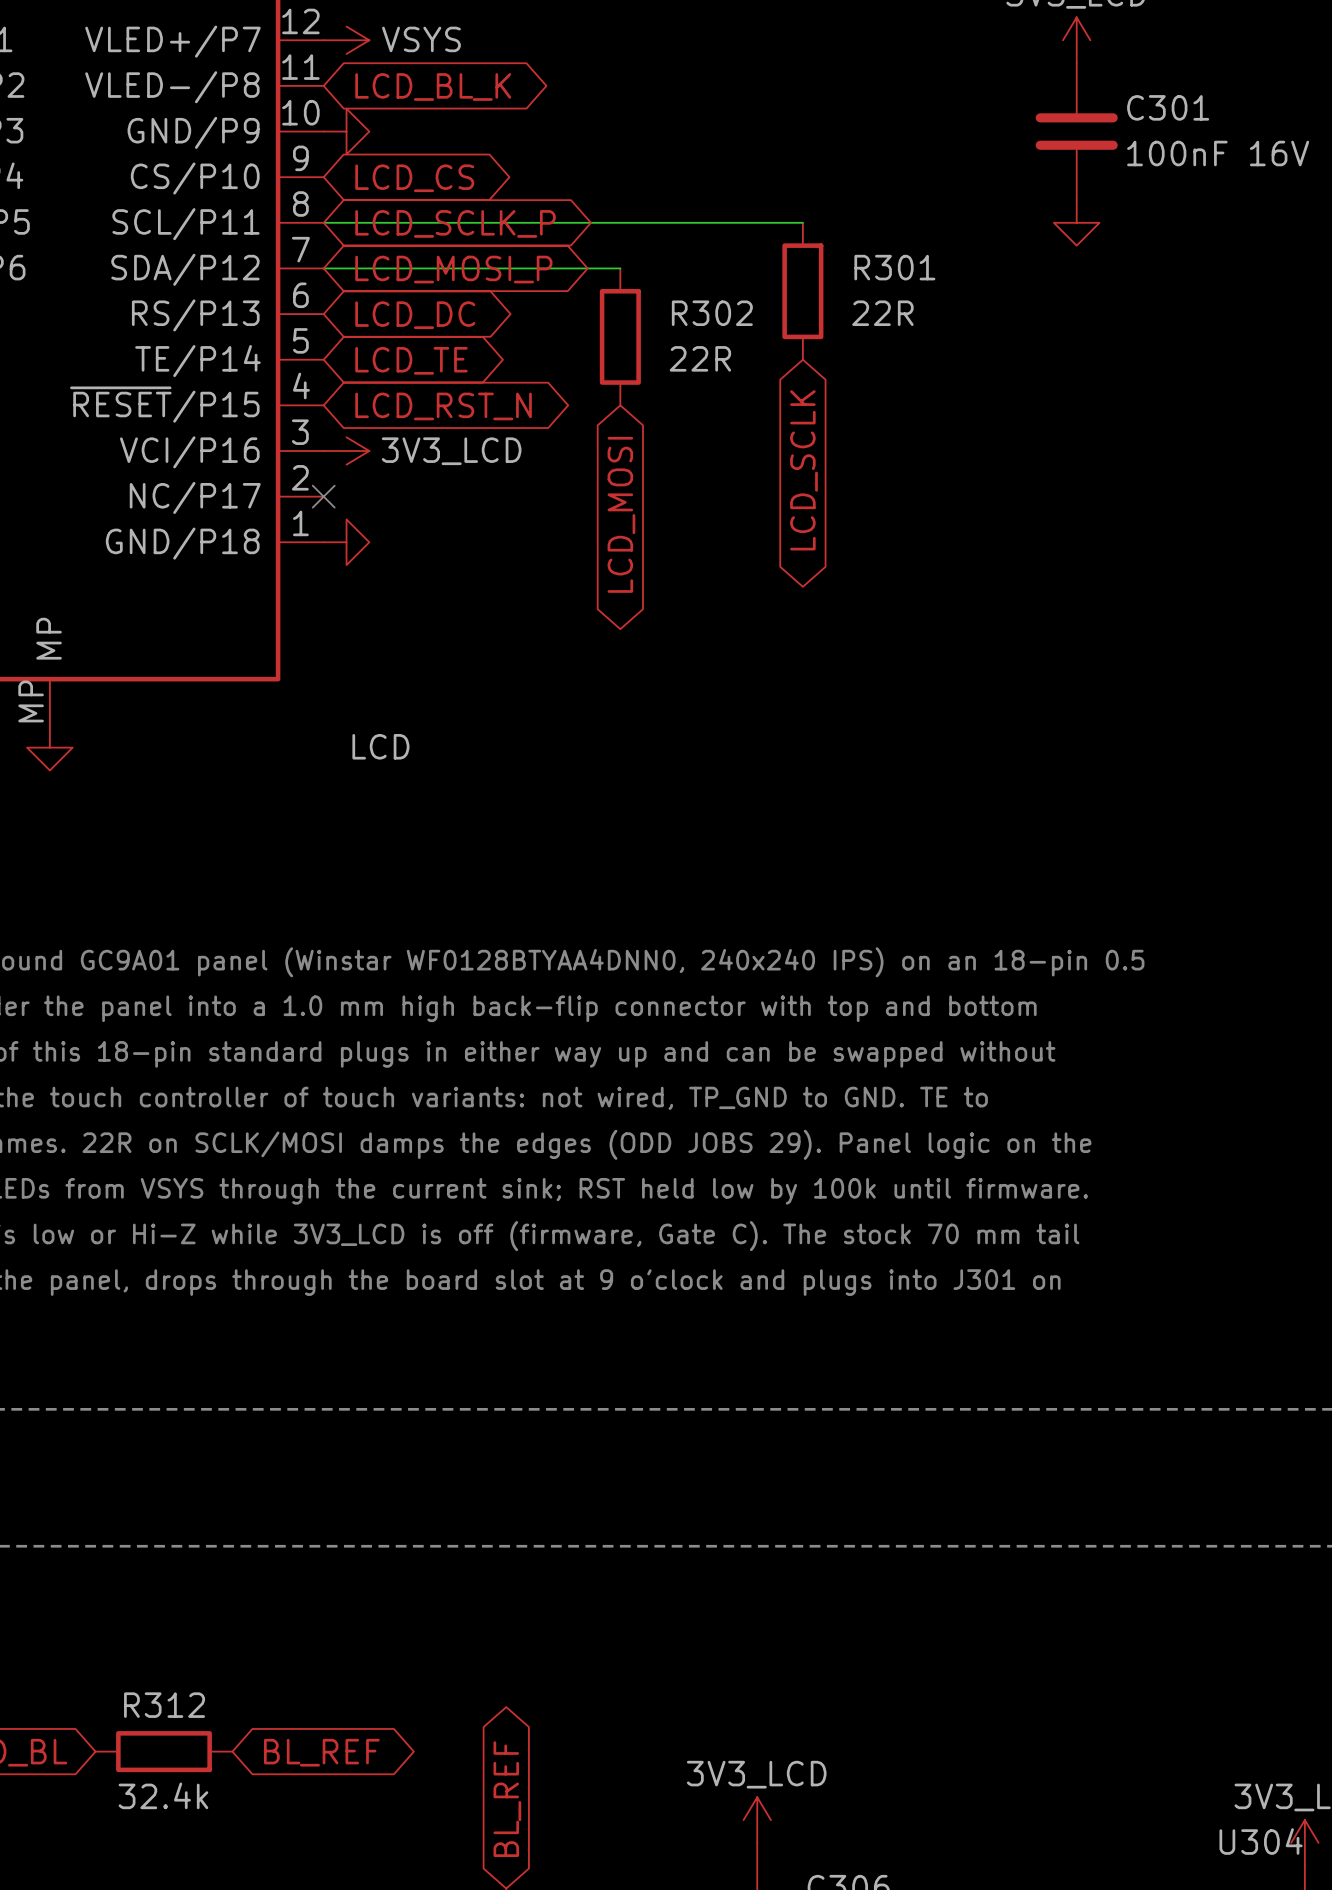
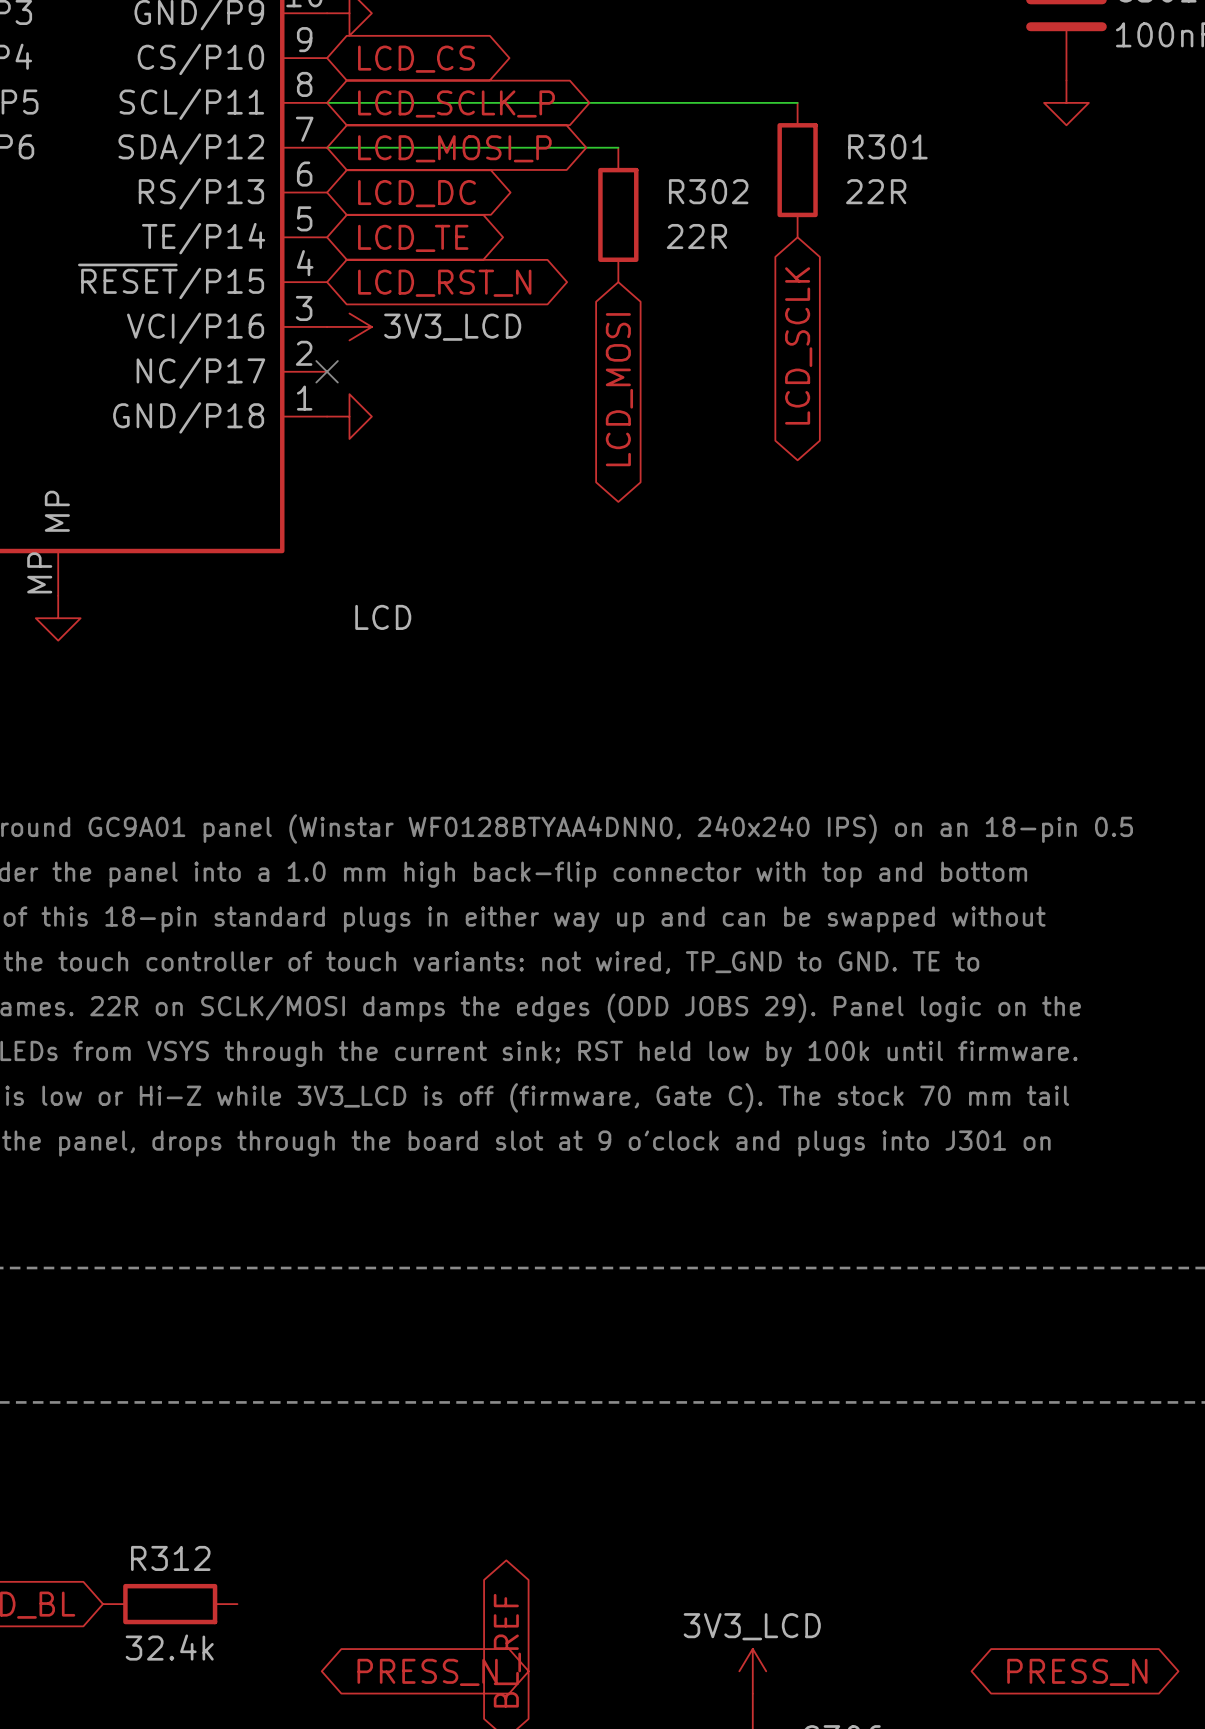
global label: BL_REF (321, 1752) -> none
global label: none -> PRESS_N (427, 1672)
global label: none -> PRESS_N (1077, 1672)

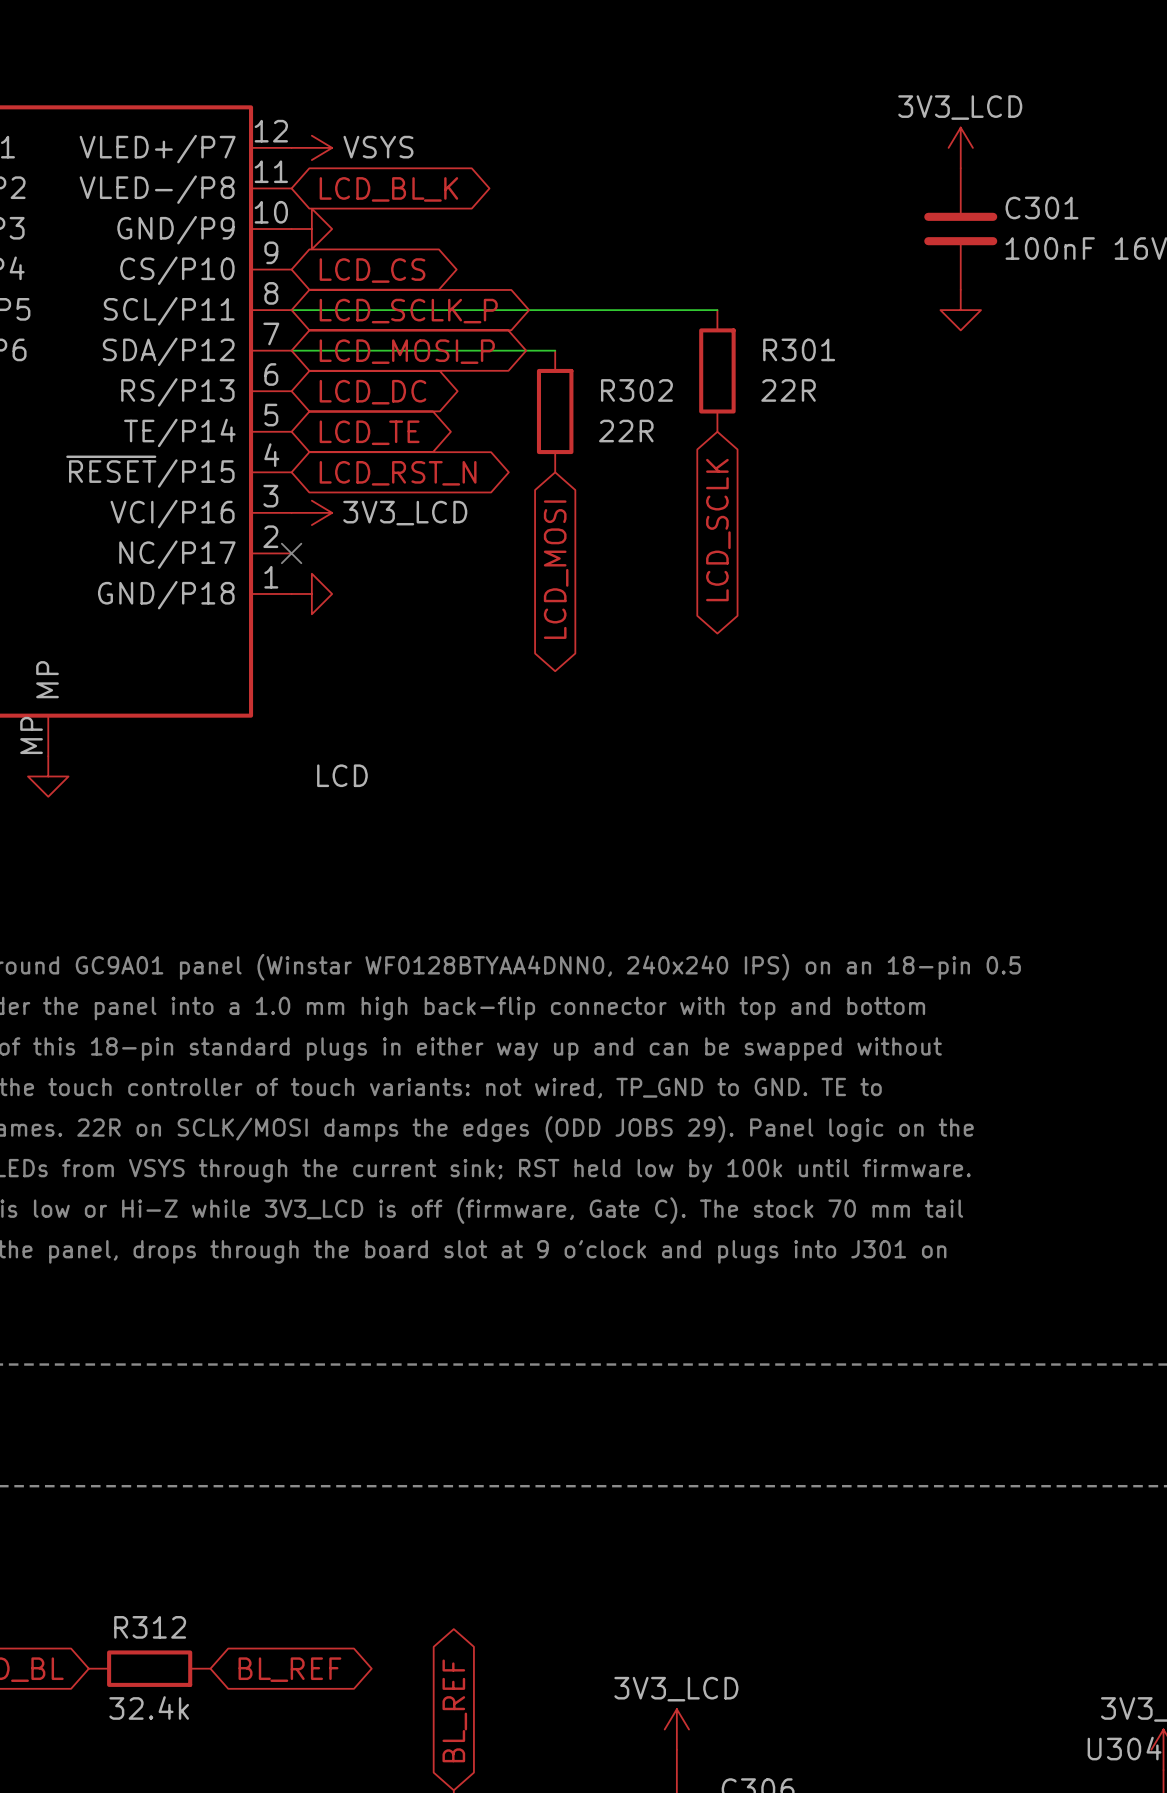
global label: none -> BL_REF (289, 1669)
global label: PRESS_N (427, 1672) -> none
global label: PRESS_N (1077, 1672) -> none

